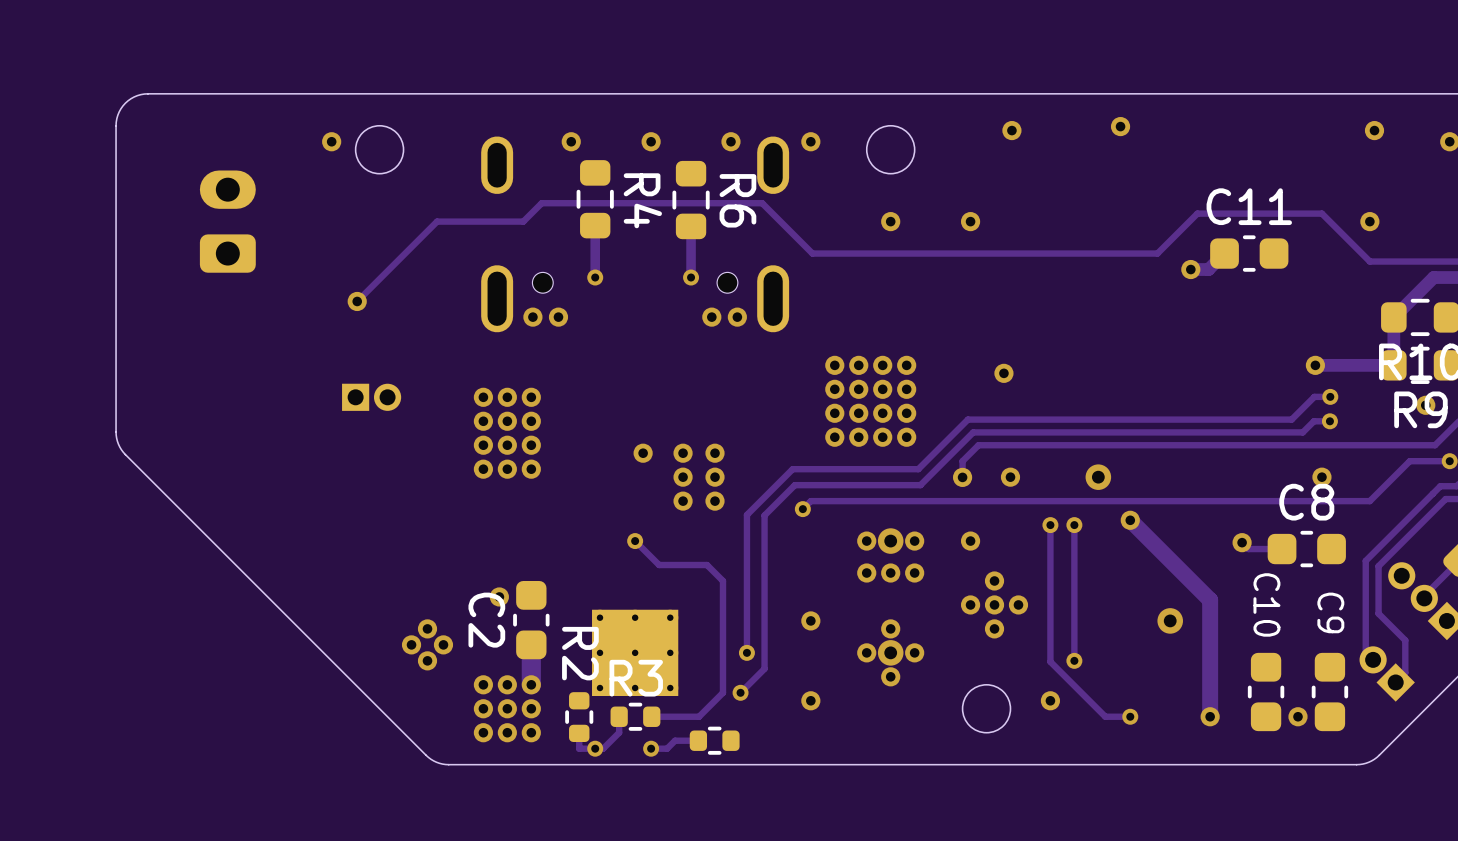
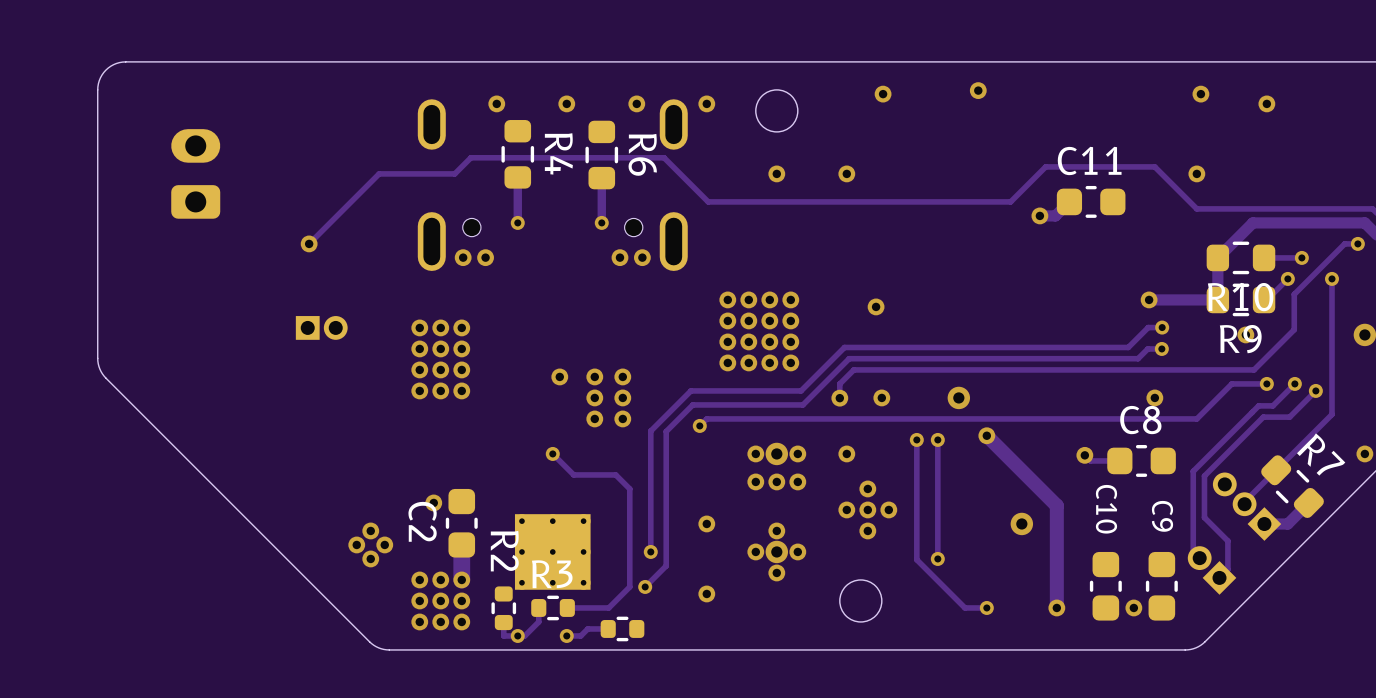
round board edge: [354, 124, 405, 175] -> none
via: (331, 141) -> none
via: (1050, 700) -> none

